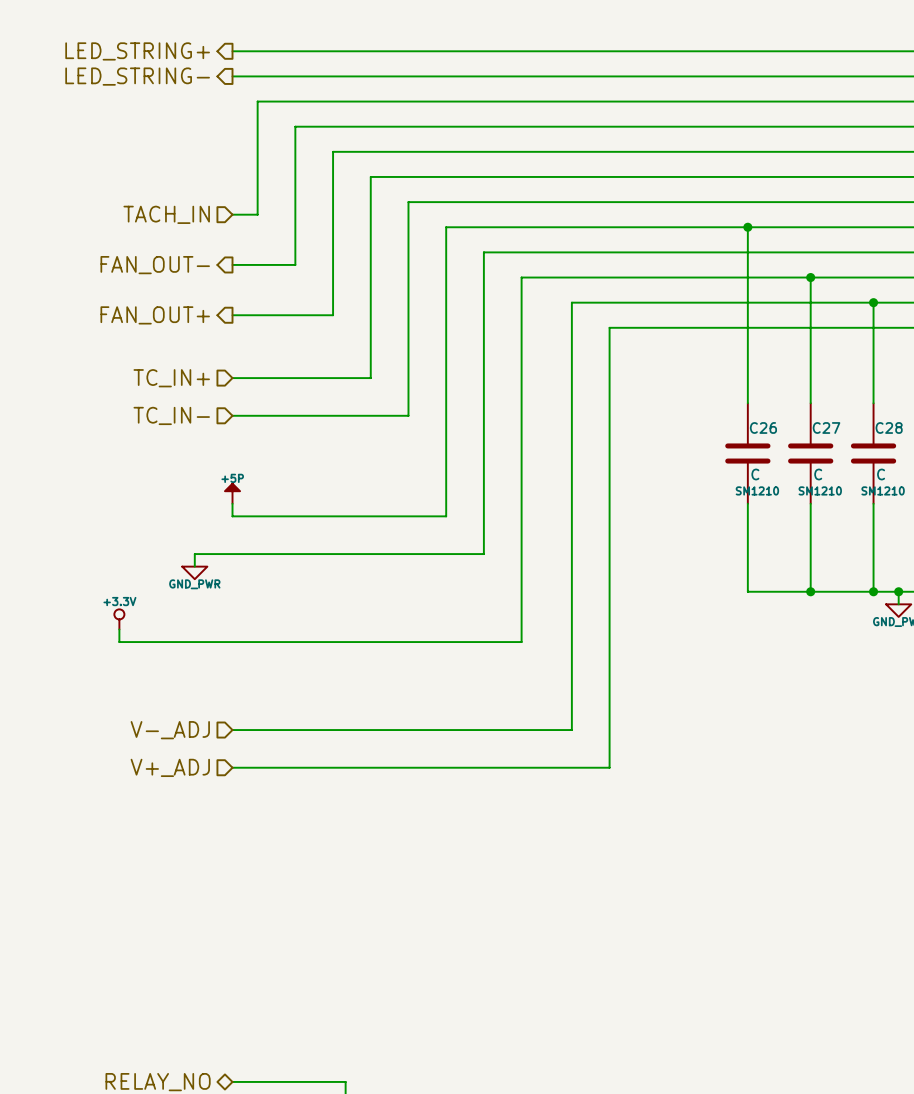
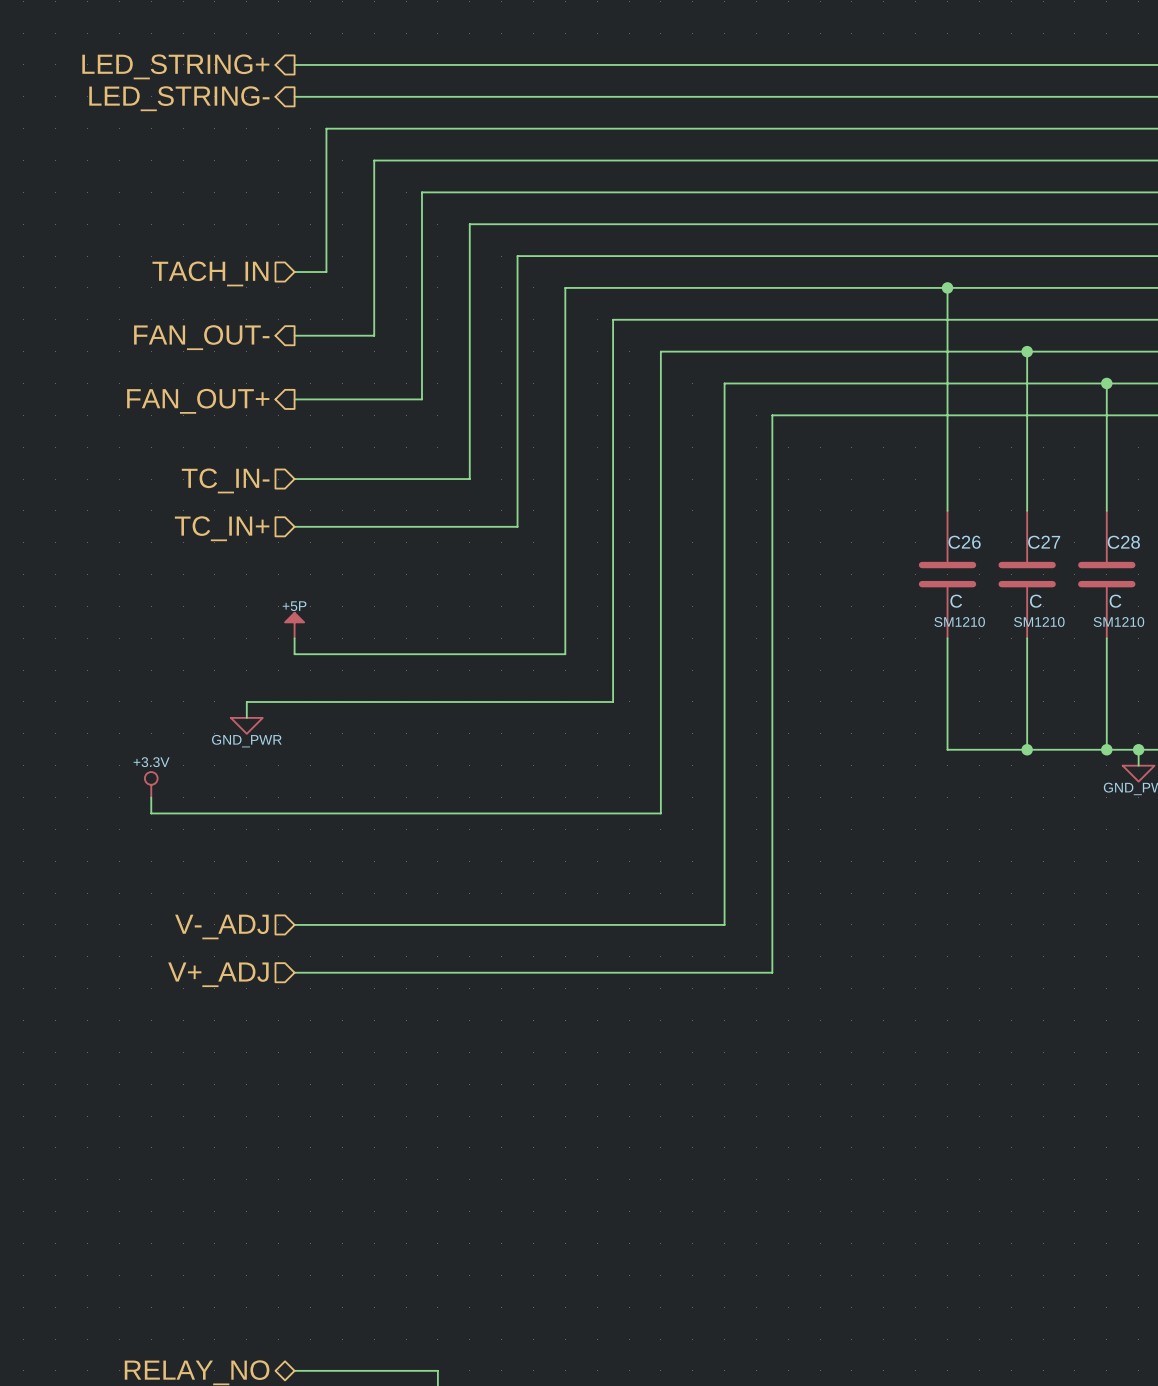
hierarchical label: TC_IN+ (171, 378) -> TC_IN- (225, 480)
hierarchical label: TC_IN- (171, 415) -> TC_IN+ (222, 528)

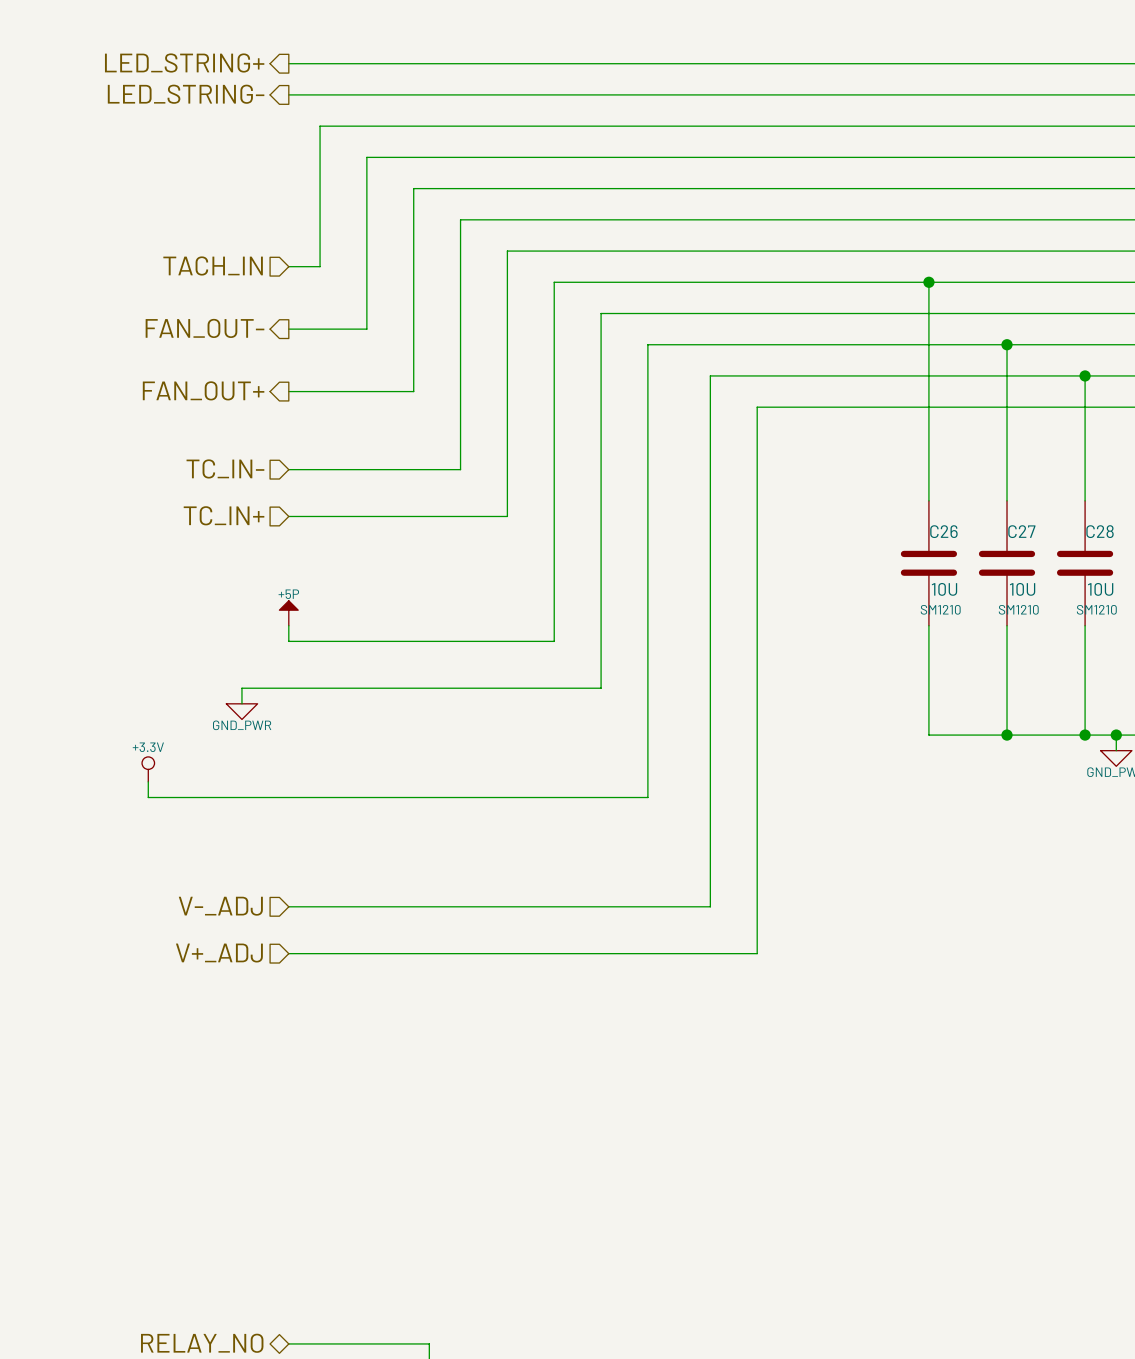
C26 value: C (956, 601) -> 10U (944, 589)
C27 value: C (1035, 601) -> 10U (1022, 589)
C28 value: C (1115, 601) -> 10U (1100, 589)

